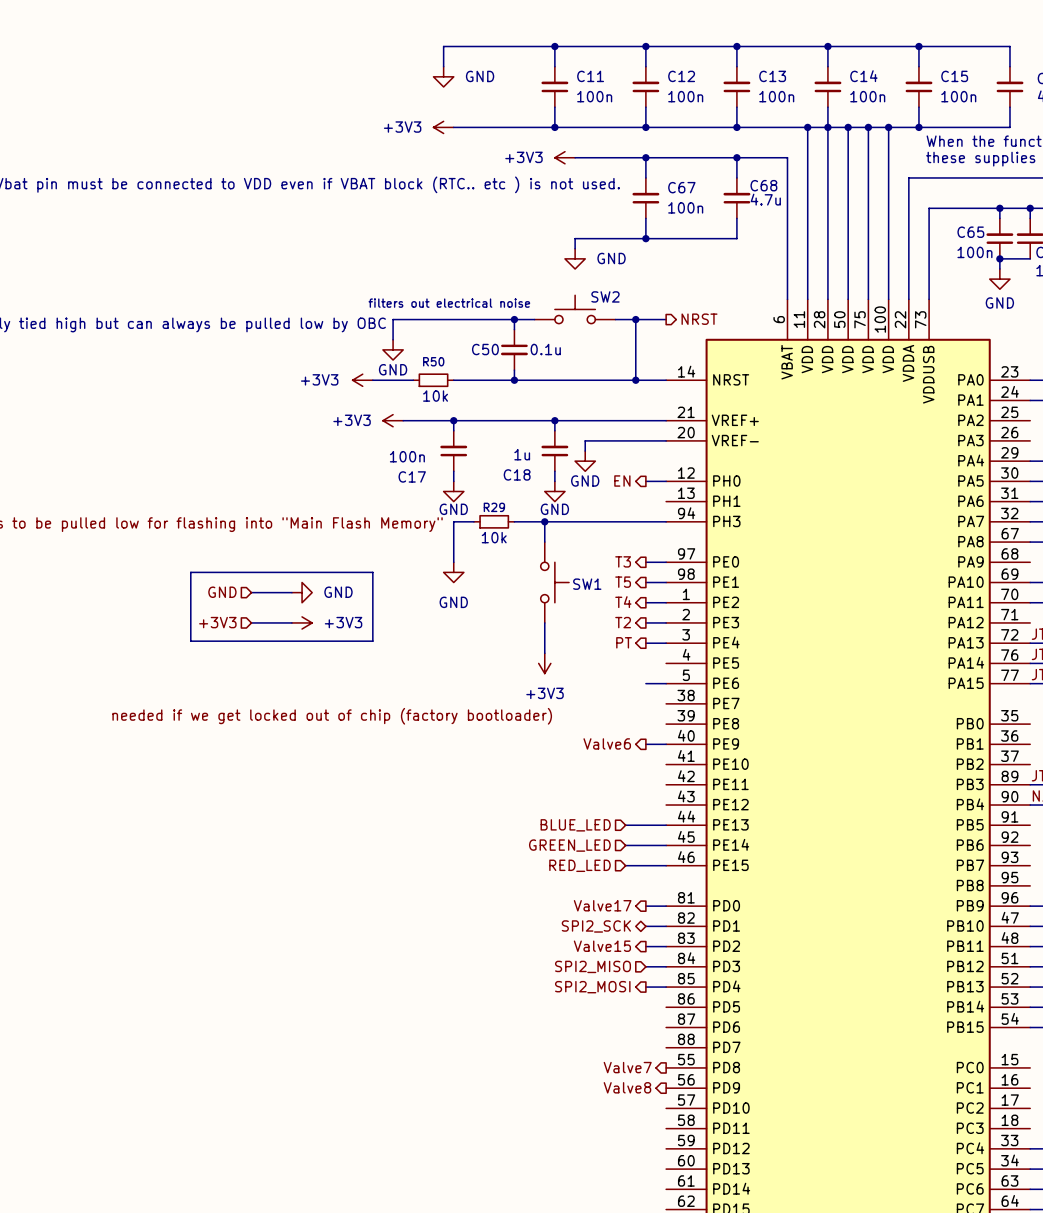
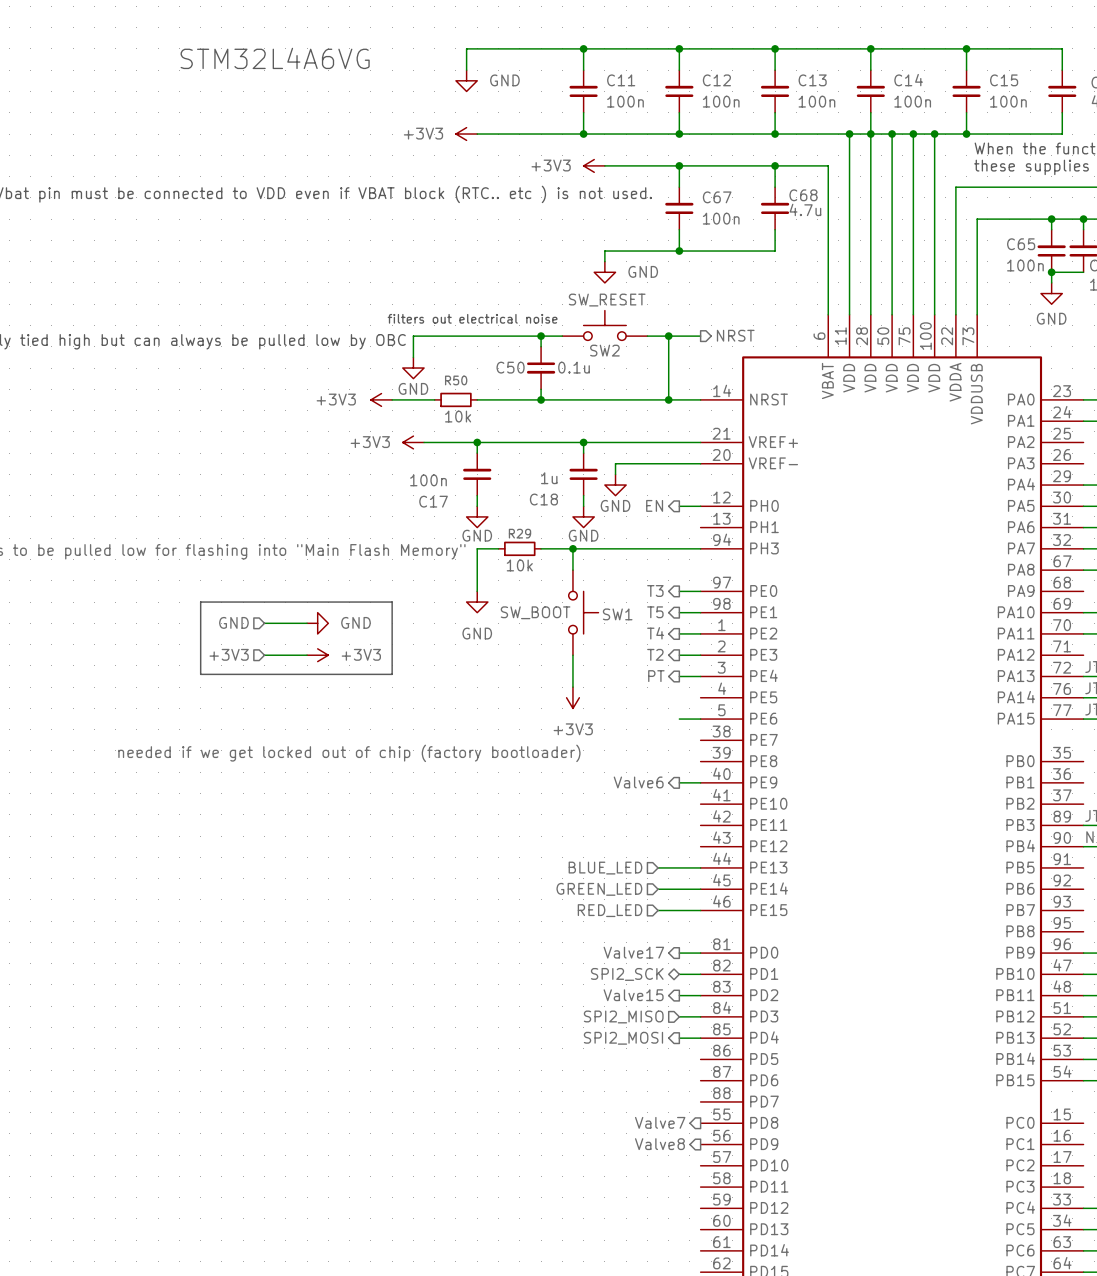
text: none -> STM32L4A6VG (275, 58)
SW2 value: none -> SW_RESET (607, 300)
SW2 name position: SW2 (605, 296) -> SW2 (604, 350)
SW1 value: none -> SW_BOOT (535, 612)

